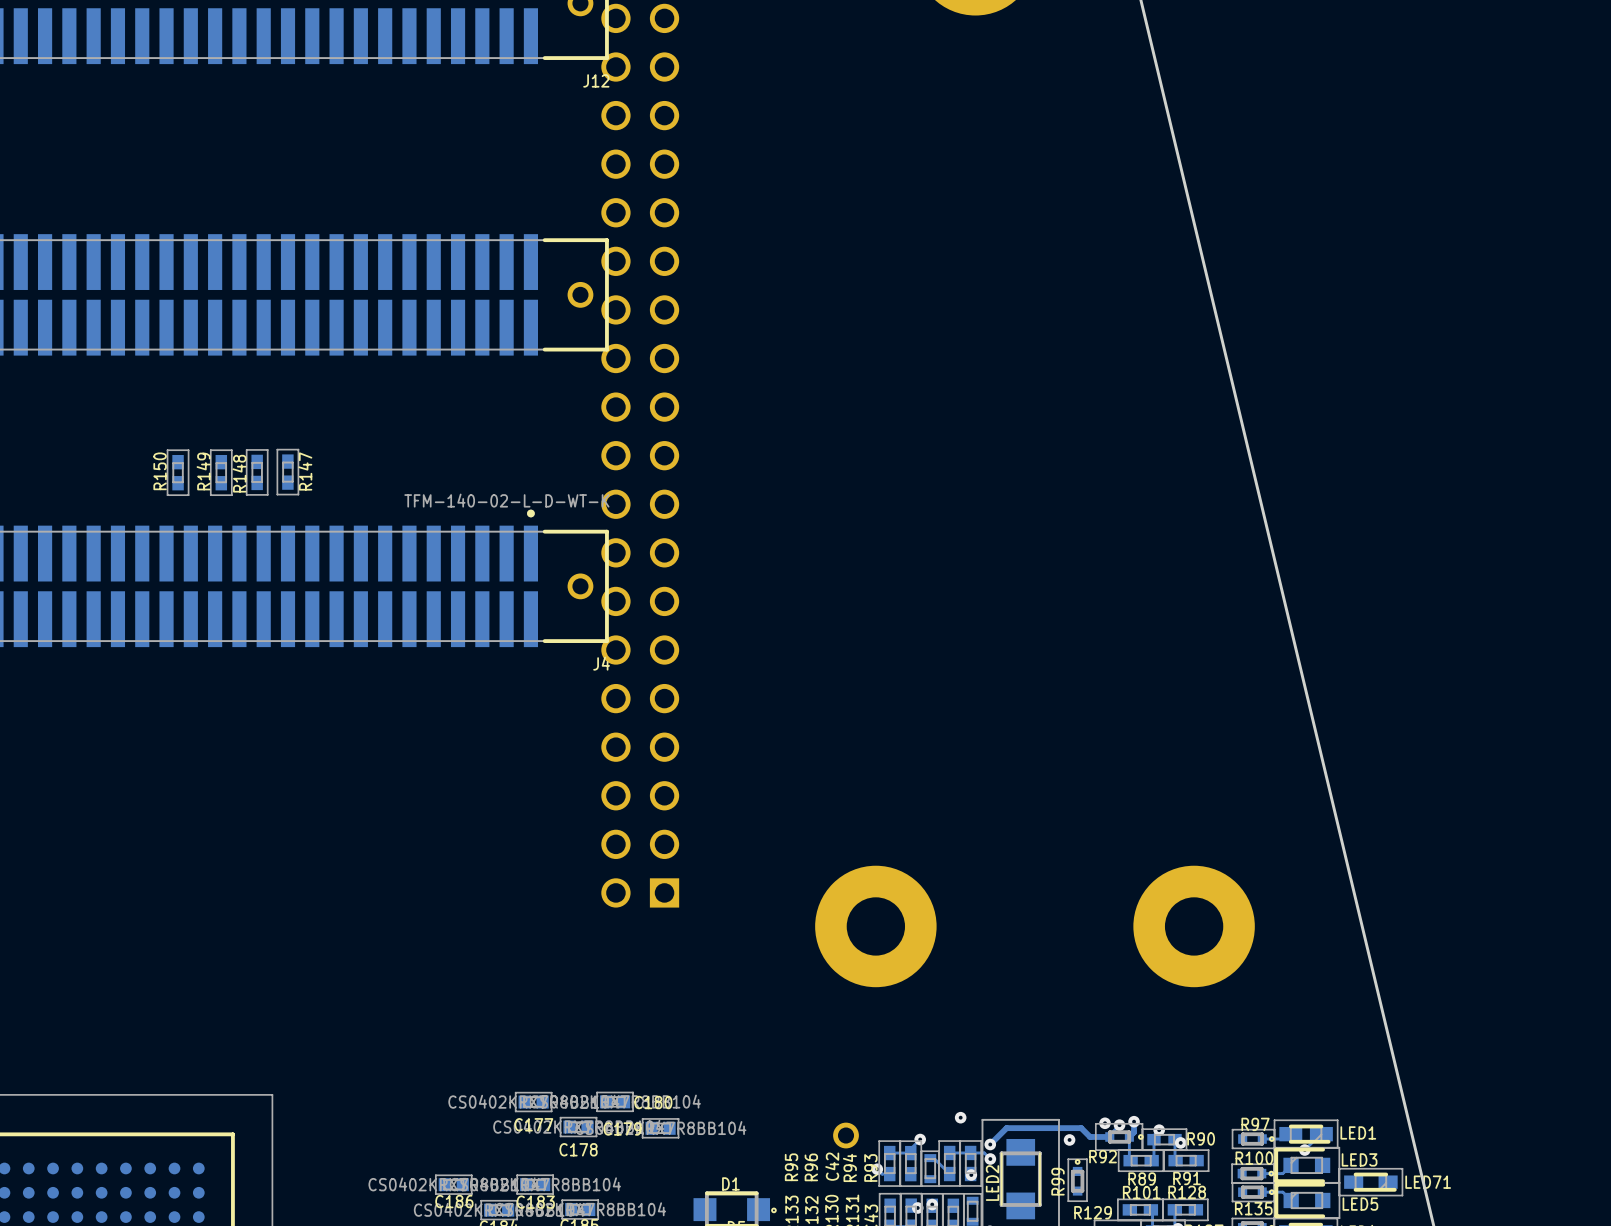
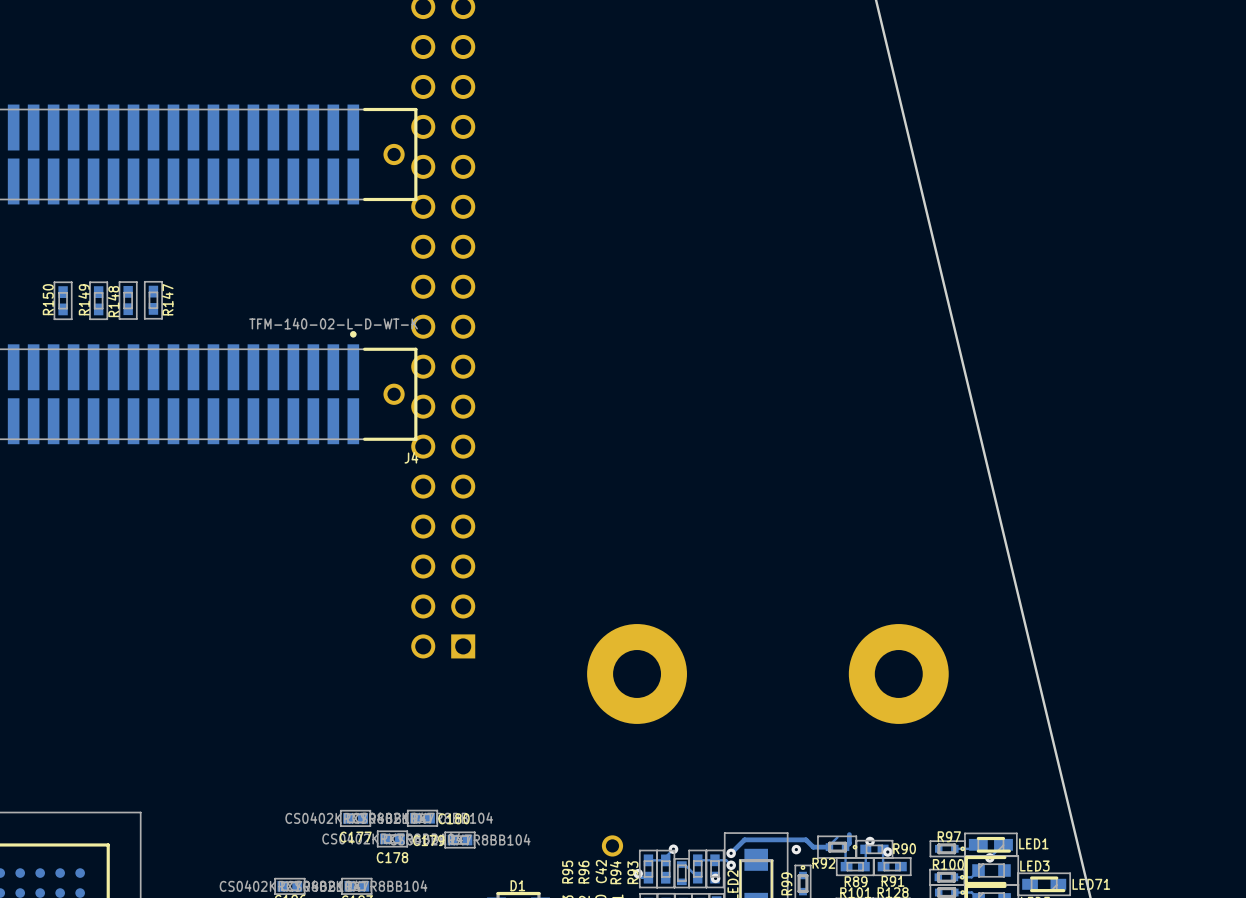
via: (960, 1117) -> none
via: (1134, 1121) -> none
via: (1105, 1123) -> none
via: (1119, 1125) -> none

